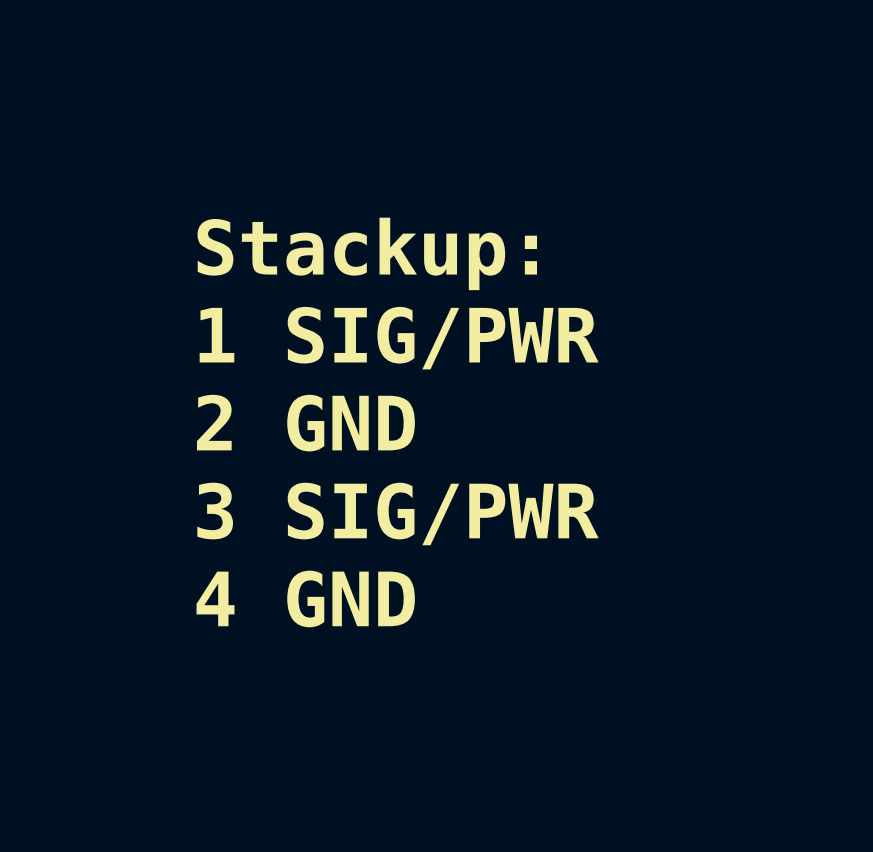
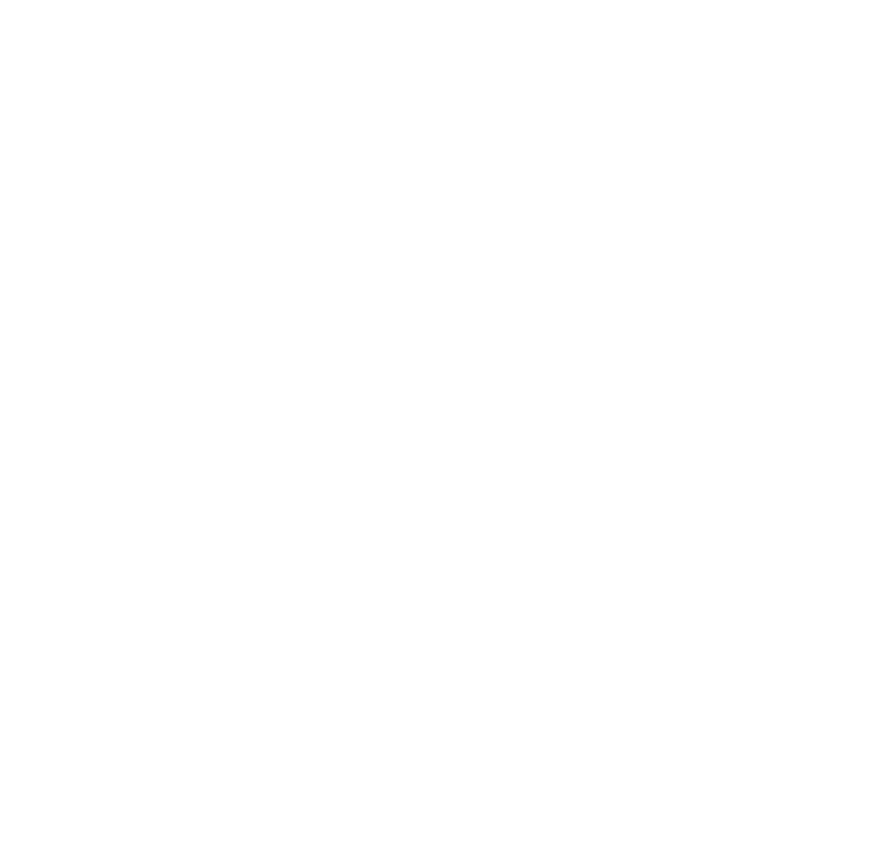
text: Stackup: (367, 253) -> none
text: 1 SIG/PWR (399, 338) -> none
text: 2 GND (305, 423) -> none
text: 3 SIG/PWR (397, 513) -> none
text: 4 GND (305, 598) -> none

